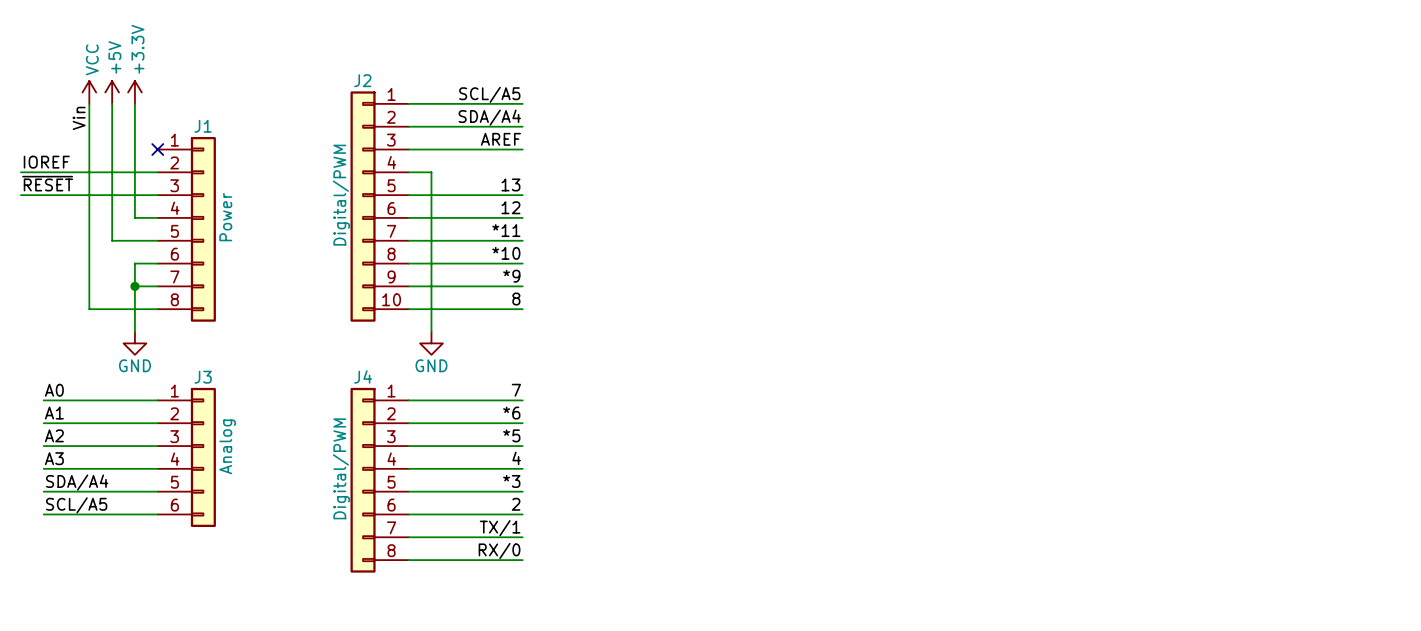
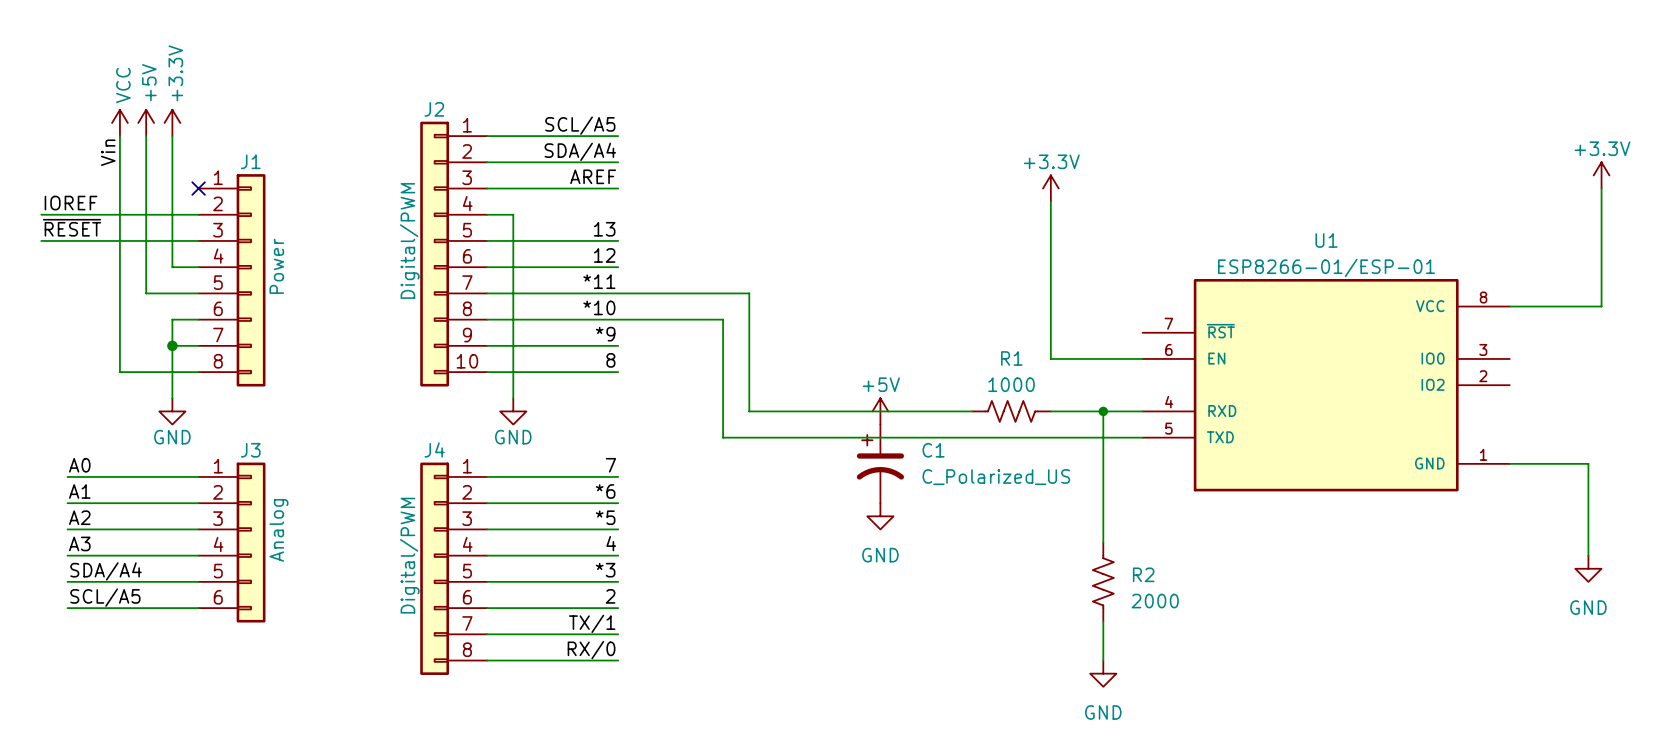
power symbol: none -> +3.3V (1601, 175)
power symbol: none -> +3.3V (1050, 188)
wire: none -> (1601, 188) (1601, 306) (1509, 306)
wire: none -> (1050, 201) (1050, 358) (1142, 358)
wire: none -> (618, 293) (749, 293) (749, 411) (972, 411)
wire: none -> (618, 319) (723, 319) (723, 437) (1142, 437)
U1: none -> ESP8266-01/ESP-01 (1326, 385)
power symbol: none -> +5V (880, 411)
R1: none -> 1000 (1011, 411)
wire: none -> (1050, 411) (1142, 411)
wire: none -> (1103, 411) (1103, 542)
junction: none -> (1103, 411)
C1: none -> C_Polarized_US (880, 463)
wire: none -> (1509, 463) (1588, 463) (1588, 555)
power symbol: none -> GND (880, 516)
power symbol: none -> GND (1588, 568)
R2: none -> 2000 (1103, 581)
wire: none -> (1103, 621) (1103, 660)
power symbol: none -> GND (1103, 673)

